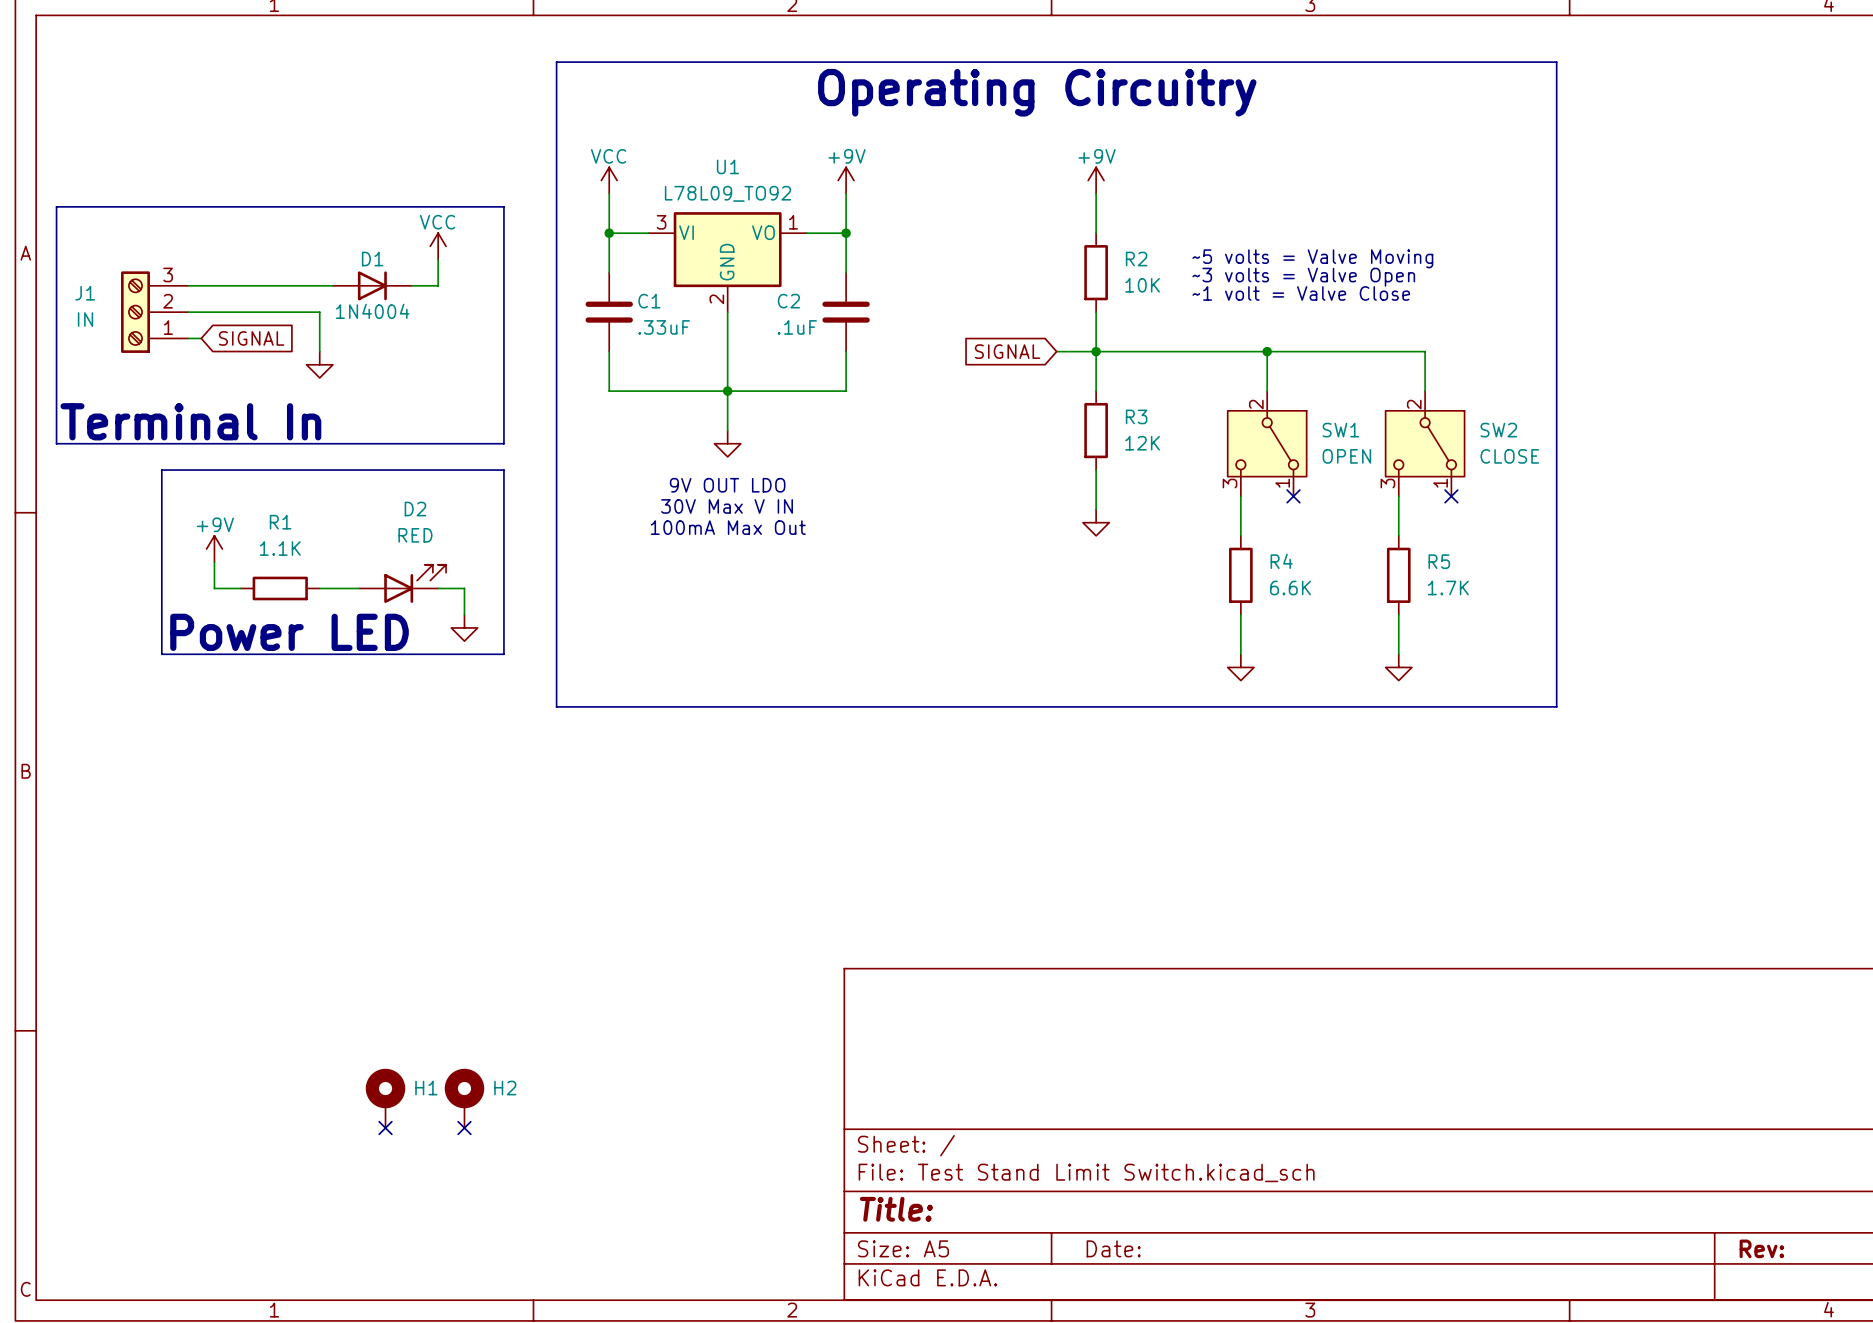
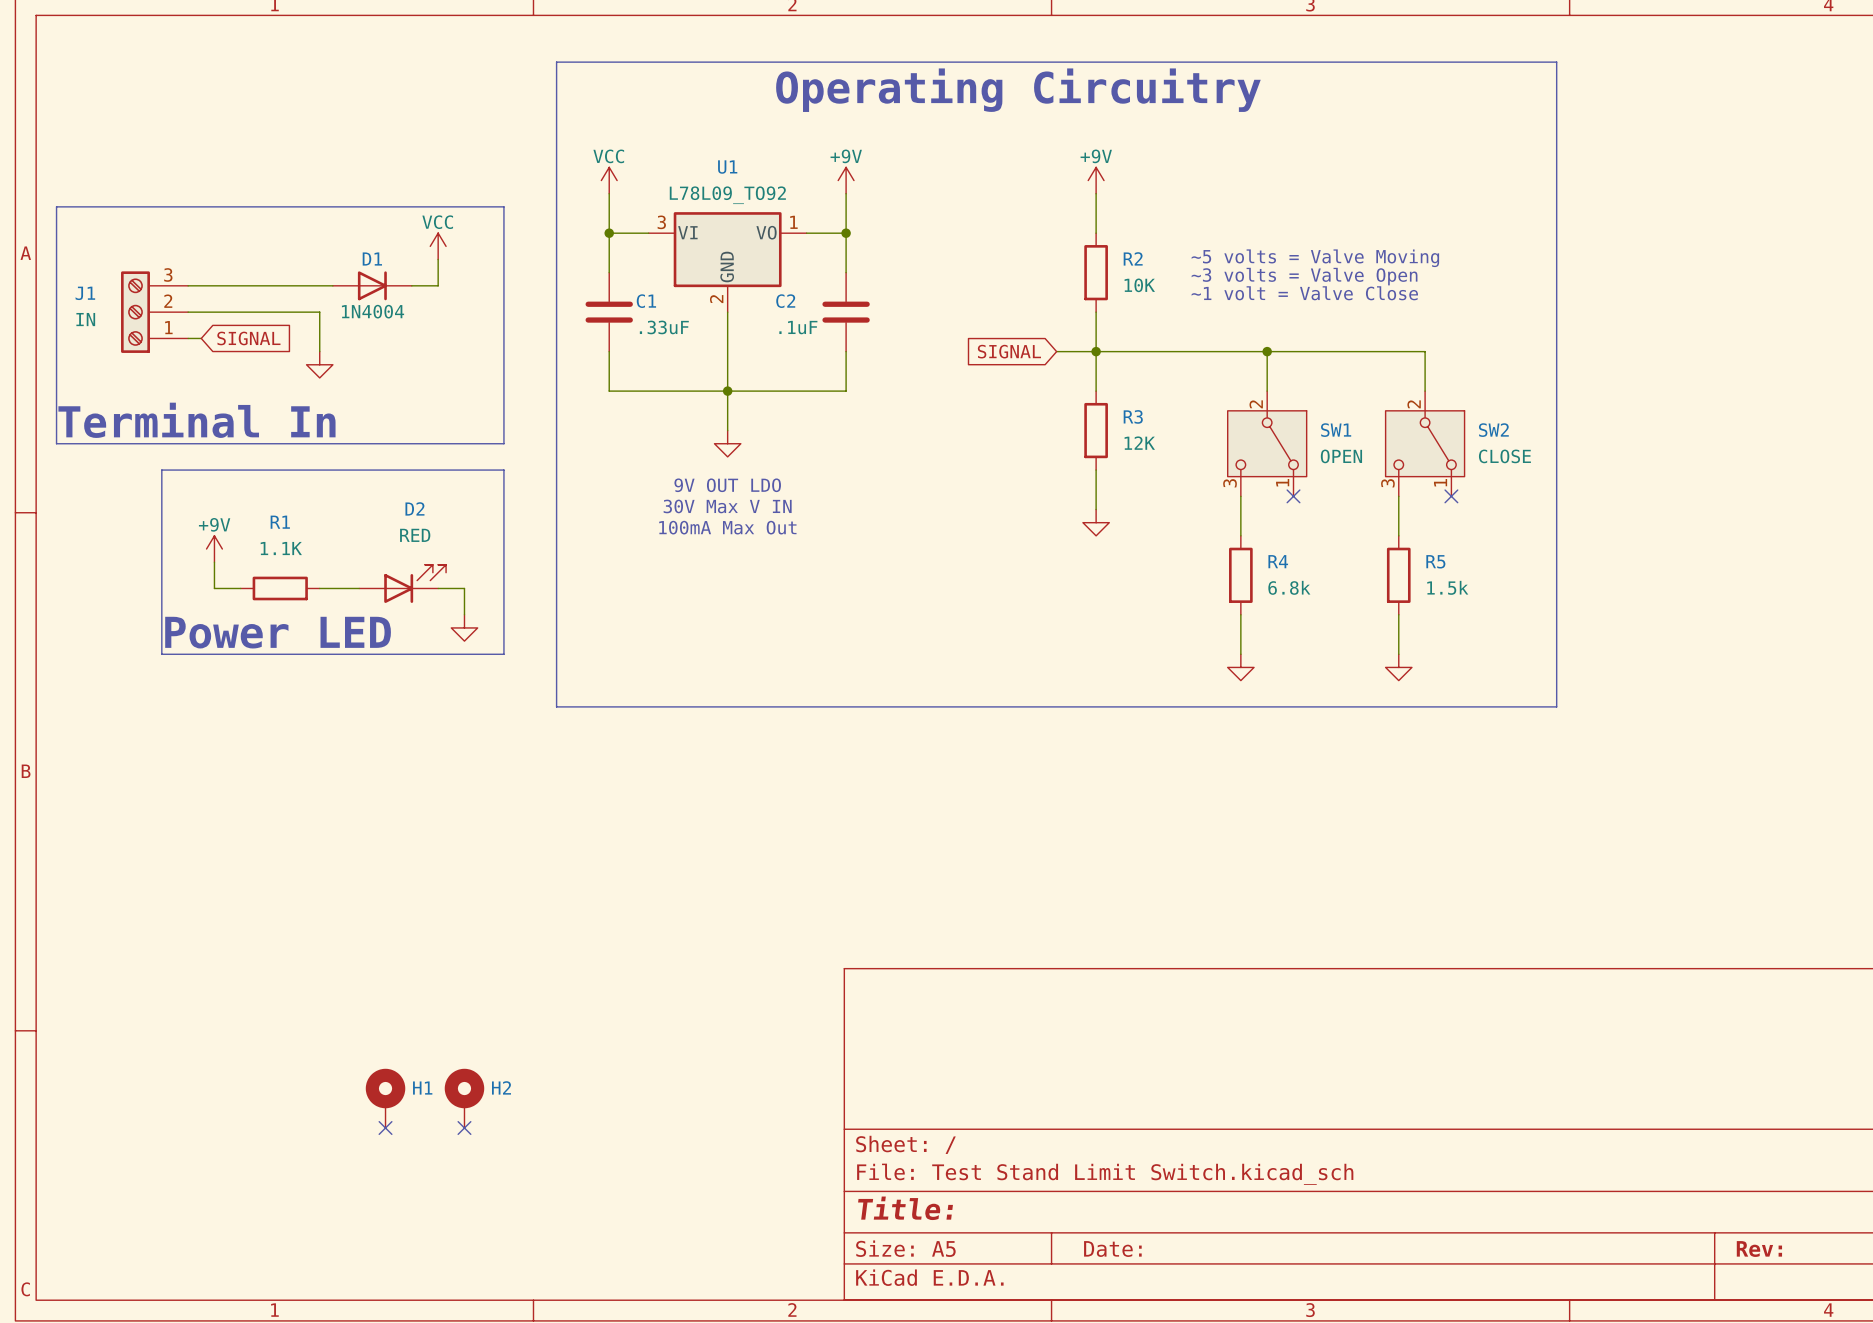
R4 value: 6.6K (1290, 587) -> 6.8k (1289, 587)
R5 value: 1.7K (1448, 587) -> 1.5k (1447, 587)

